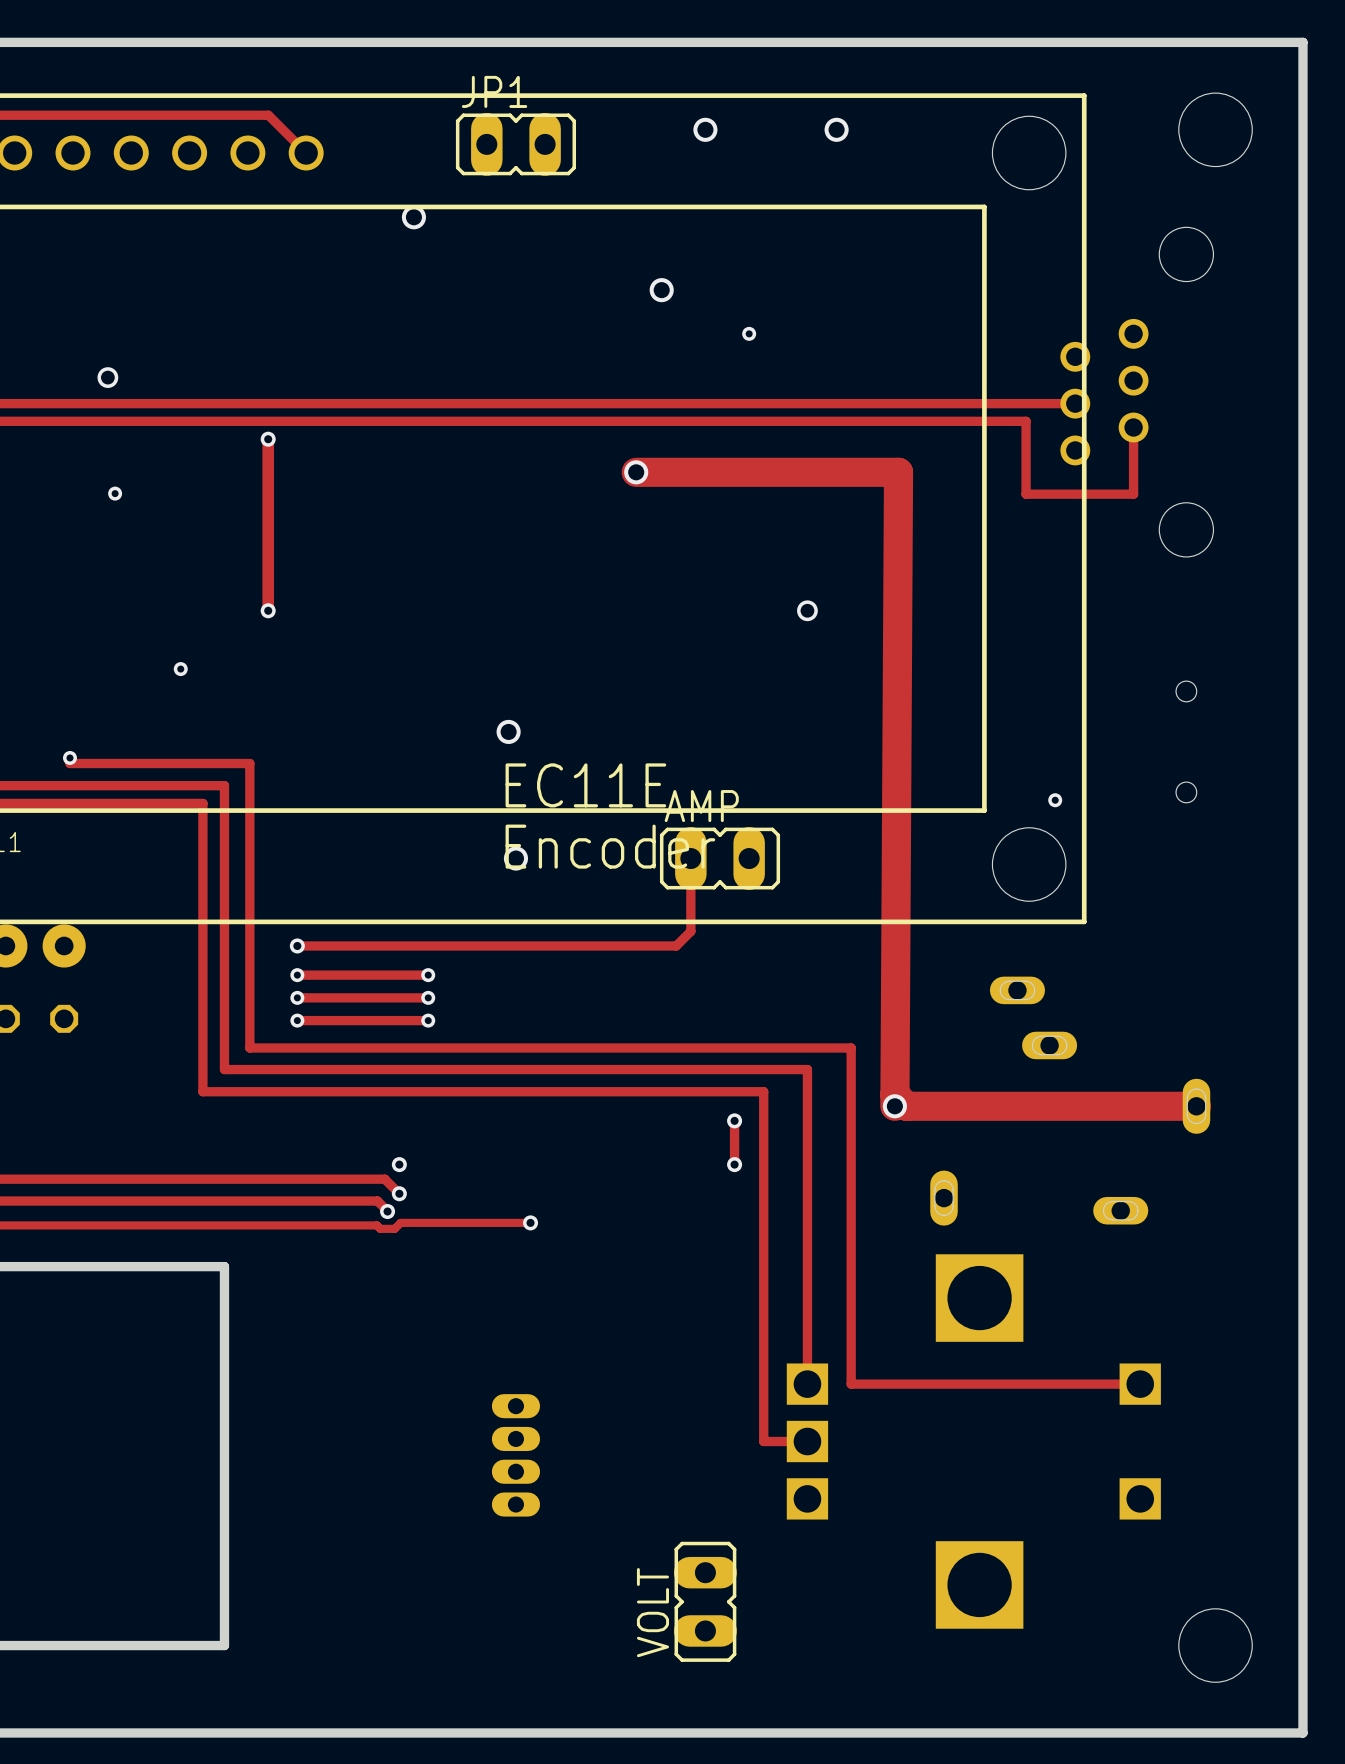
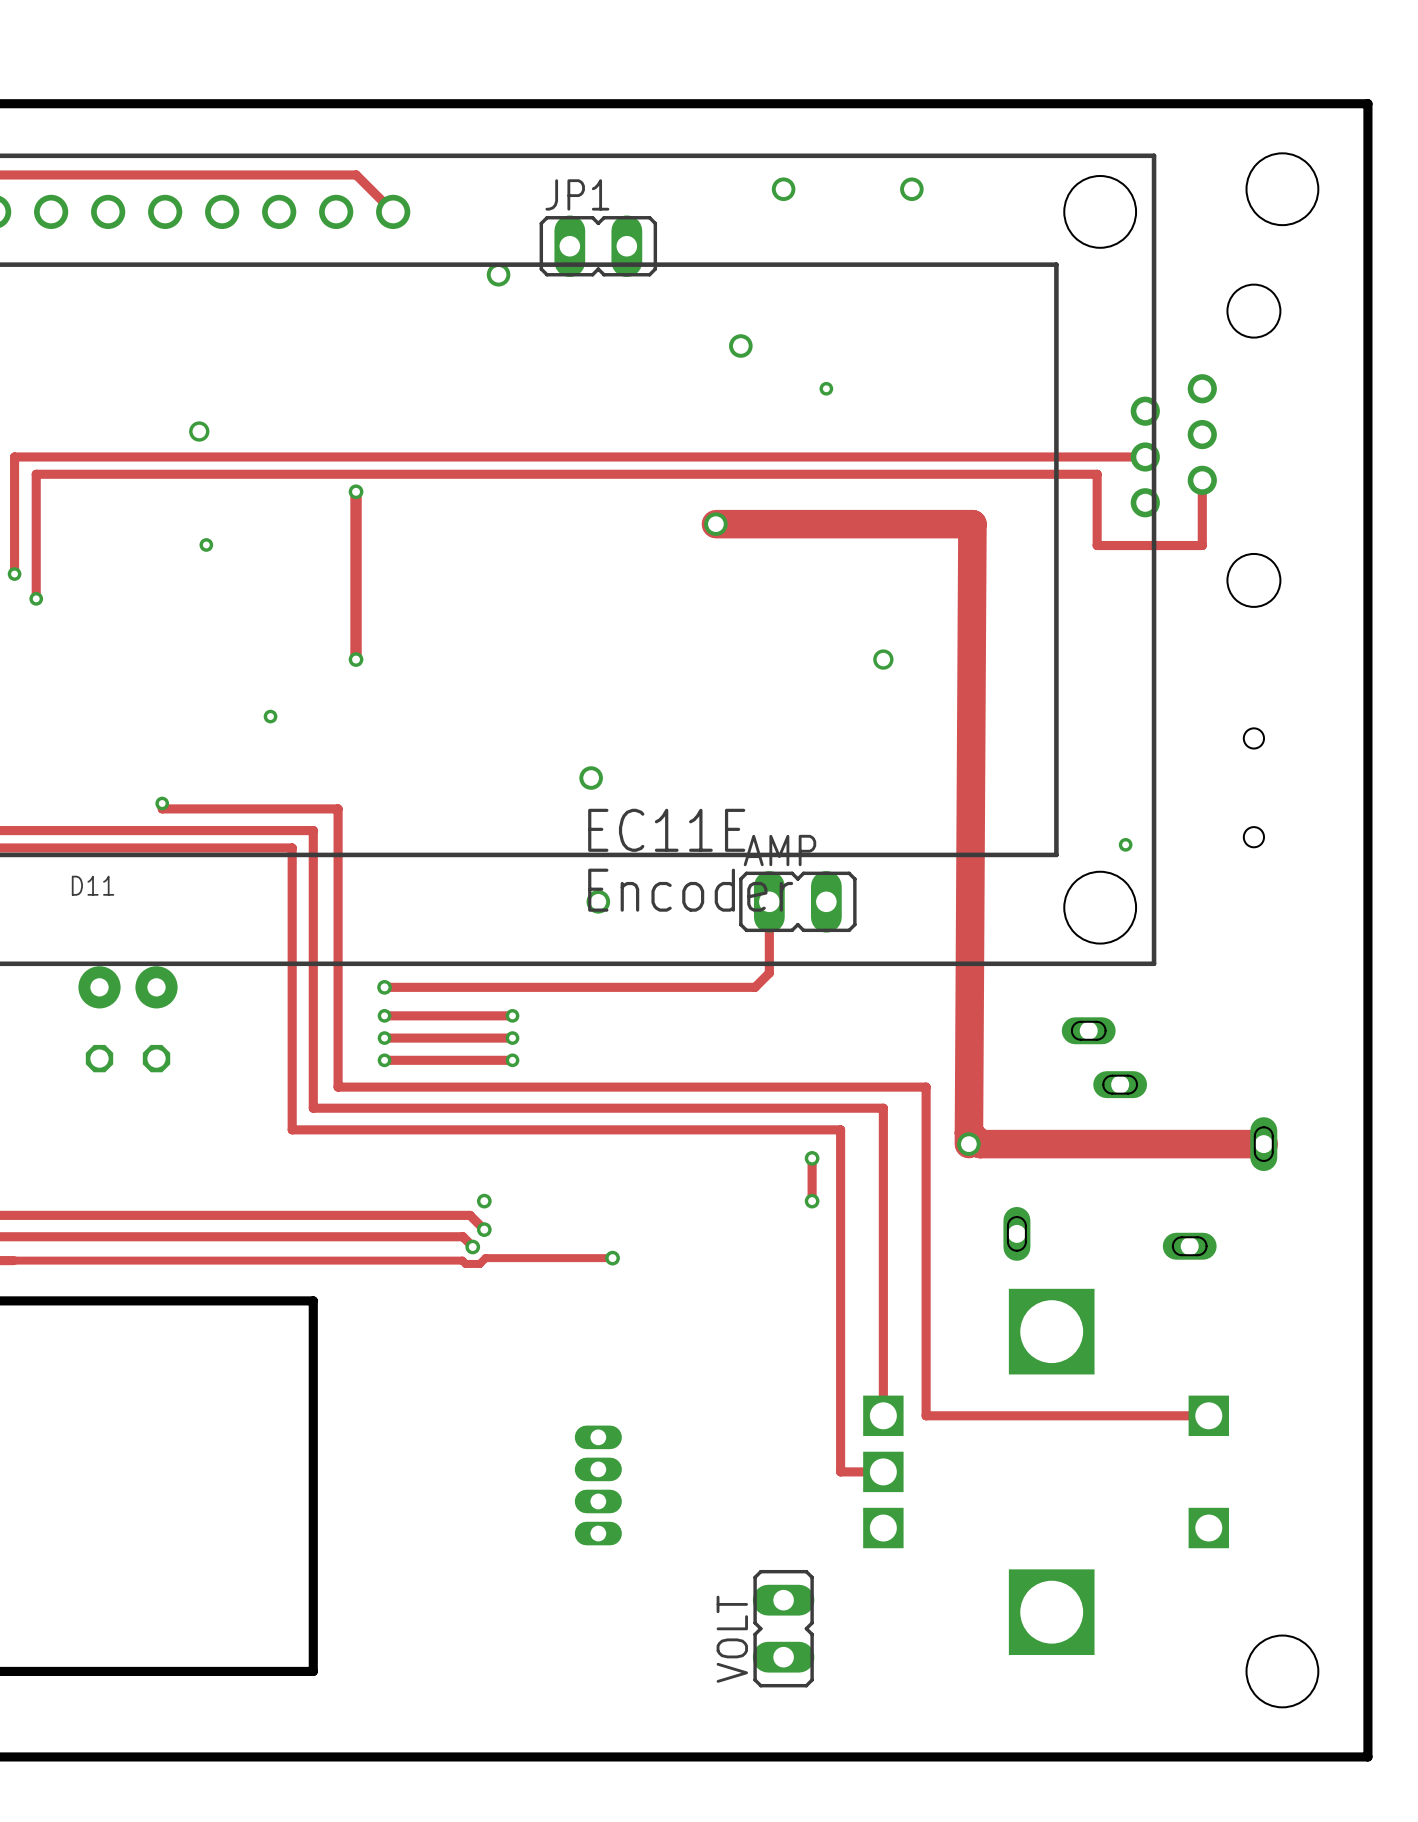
JP1 position: (515, 144) -> (598, 246)

